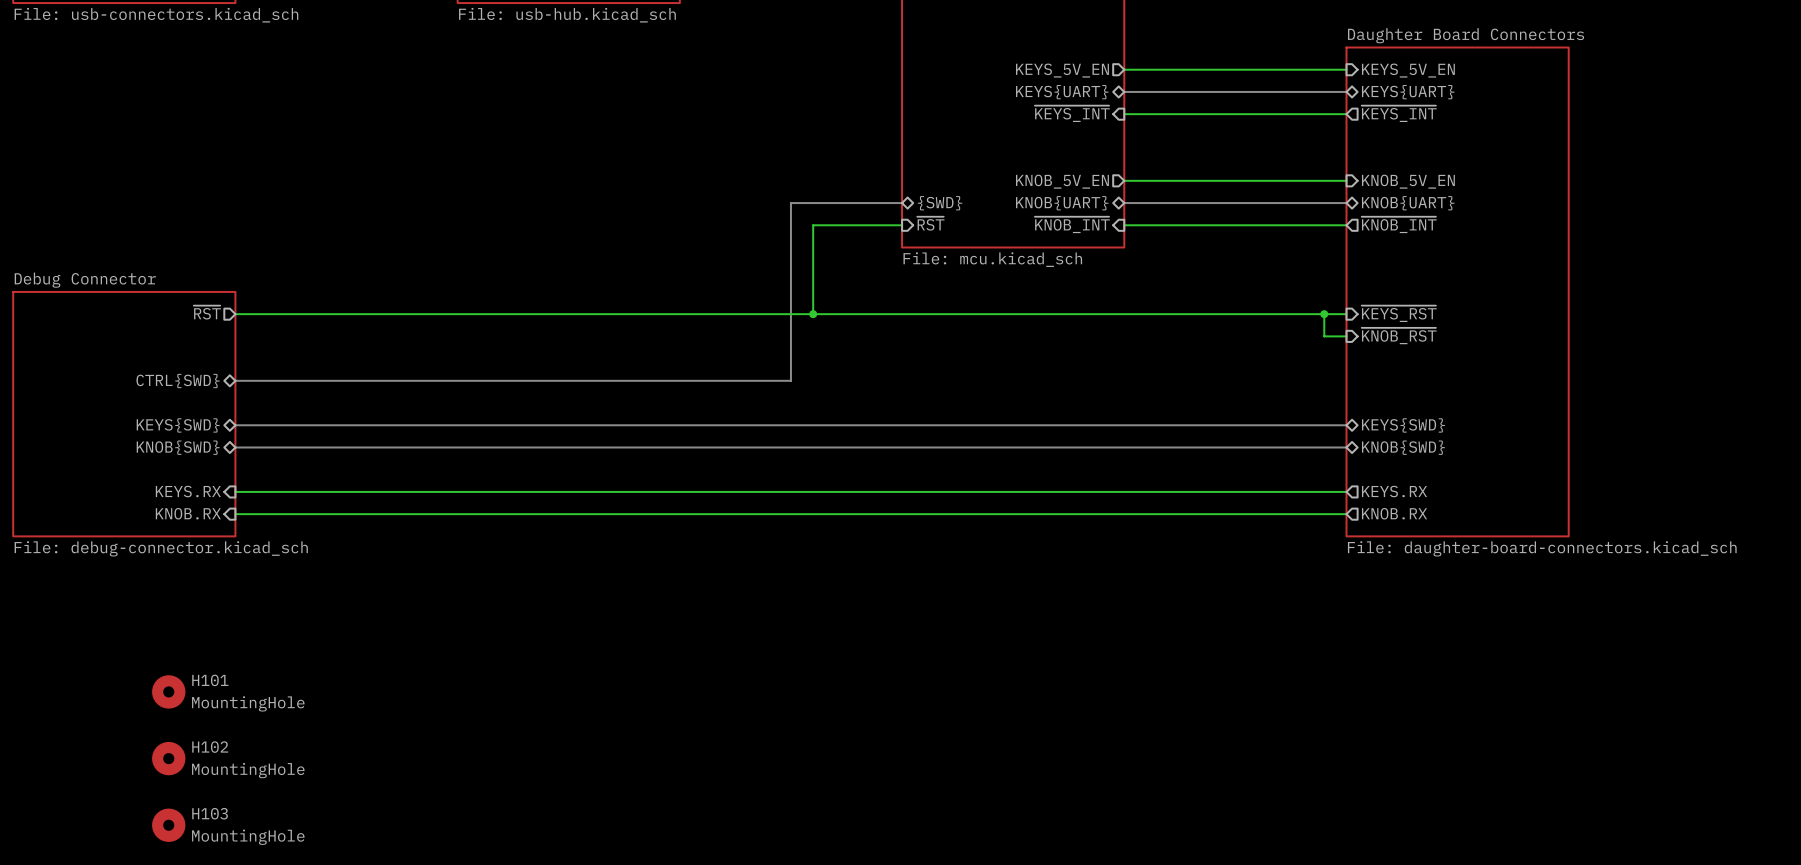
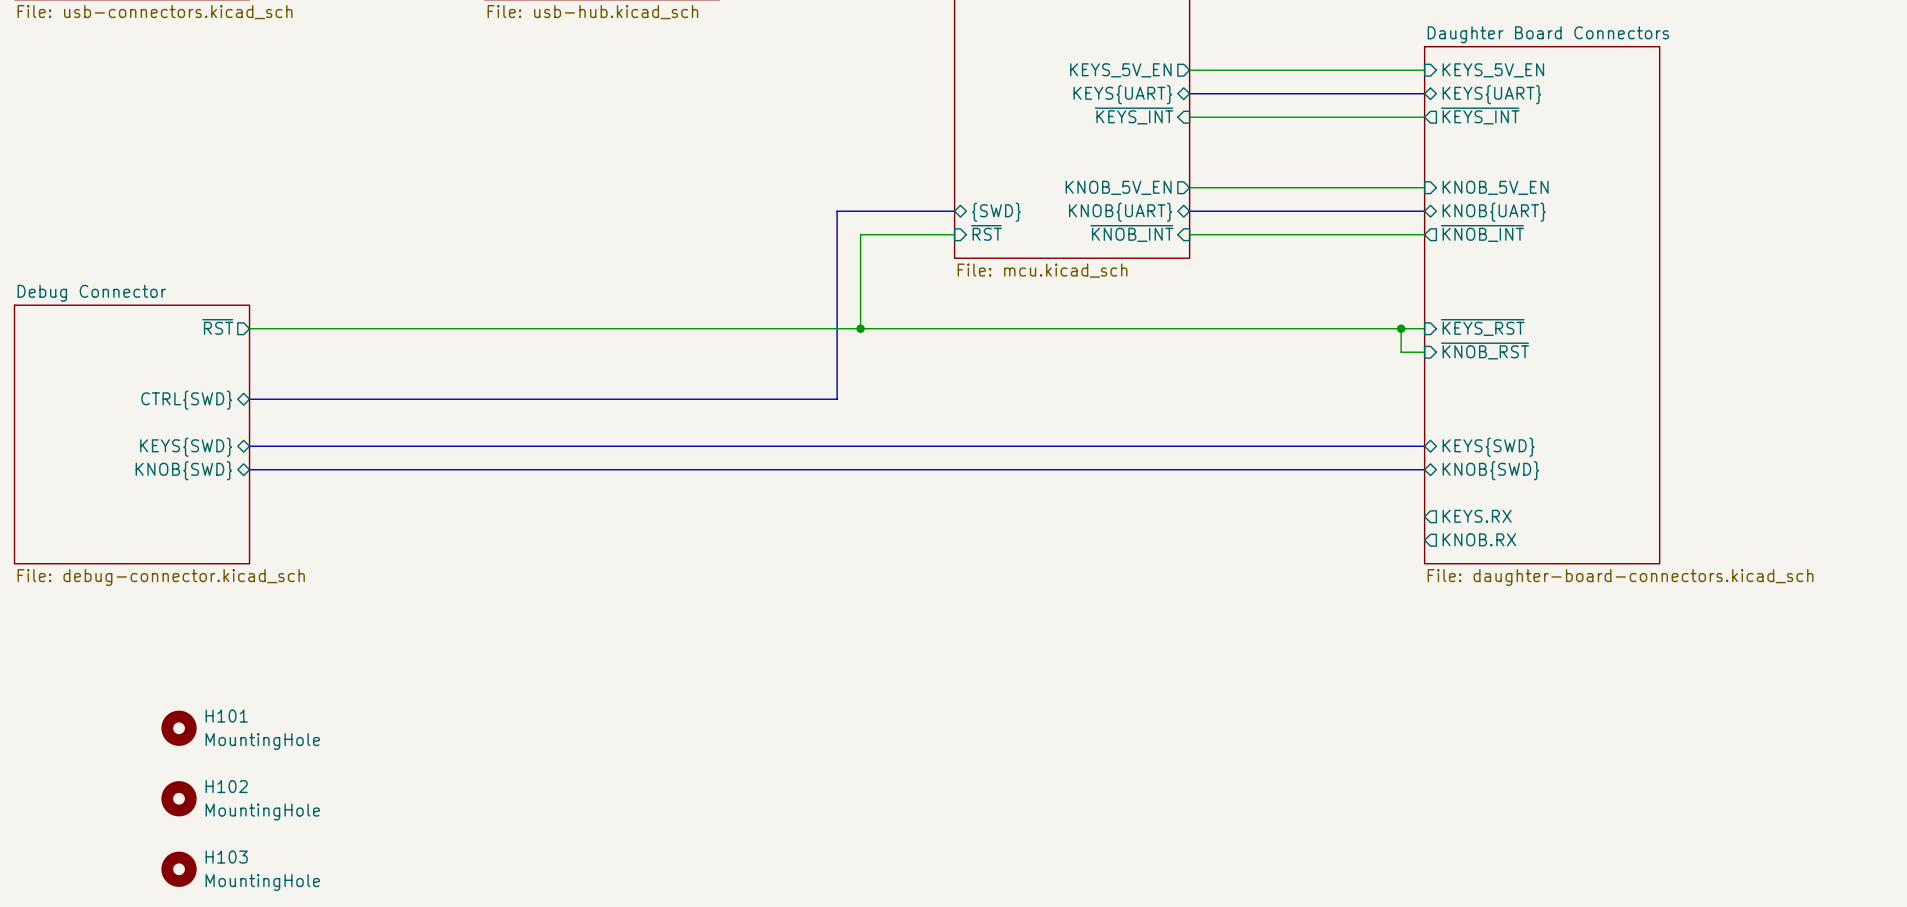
sheet pin: KEYS.RX (188, 491) -> none
wire: (235, 491) (1346, 491) -> none
sheet pin: KNOB.RX (188, 513) -> none
wire: (235, 514) (1346, 514) -> none

